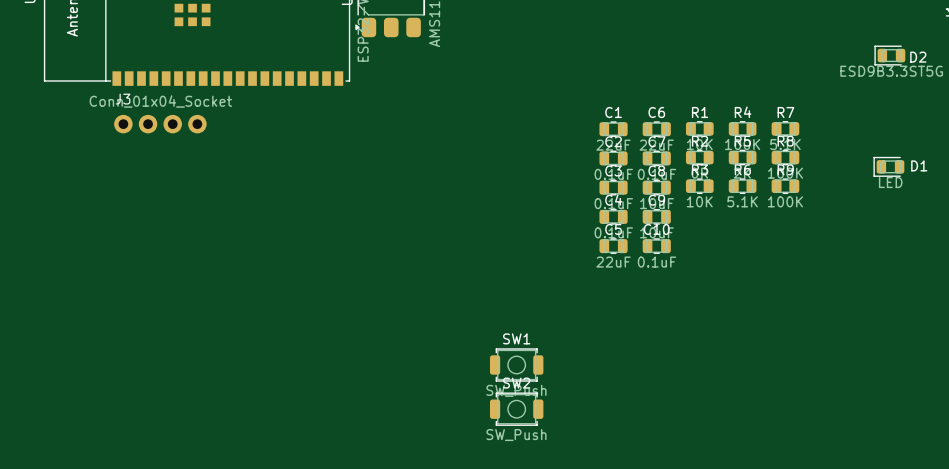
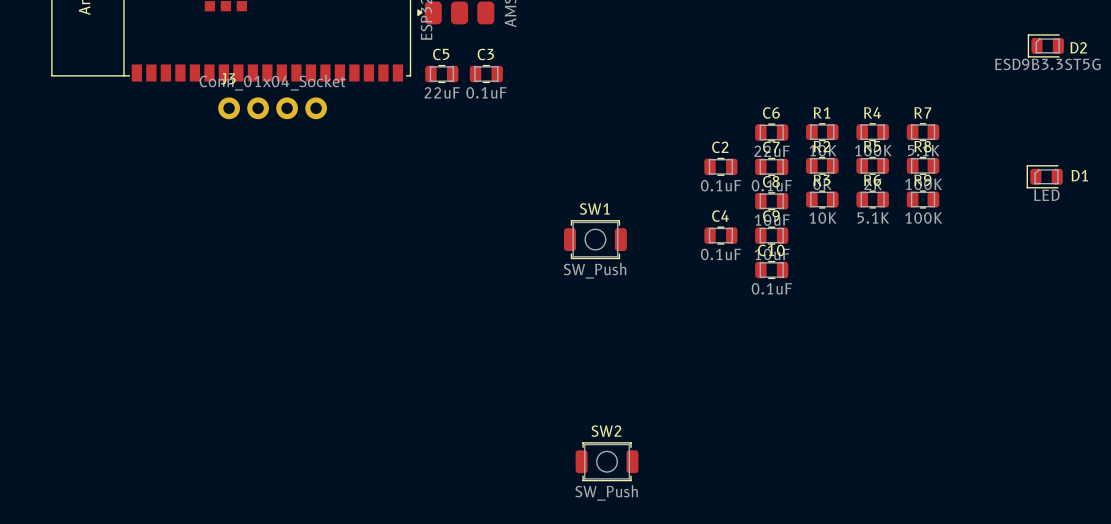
J3 position: (160, 124) -> (272, 108)
C1: 22uF (613, 129) -> none
C3 position: (613, 187) -> (486, 74)
C5 position: (613, 246) -> (441, 74)
SW1 position: (516, 365) -> (595, 239)

